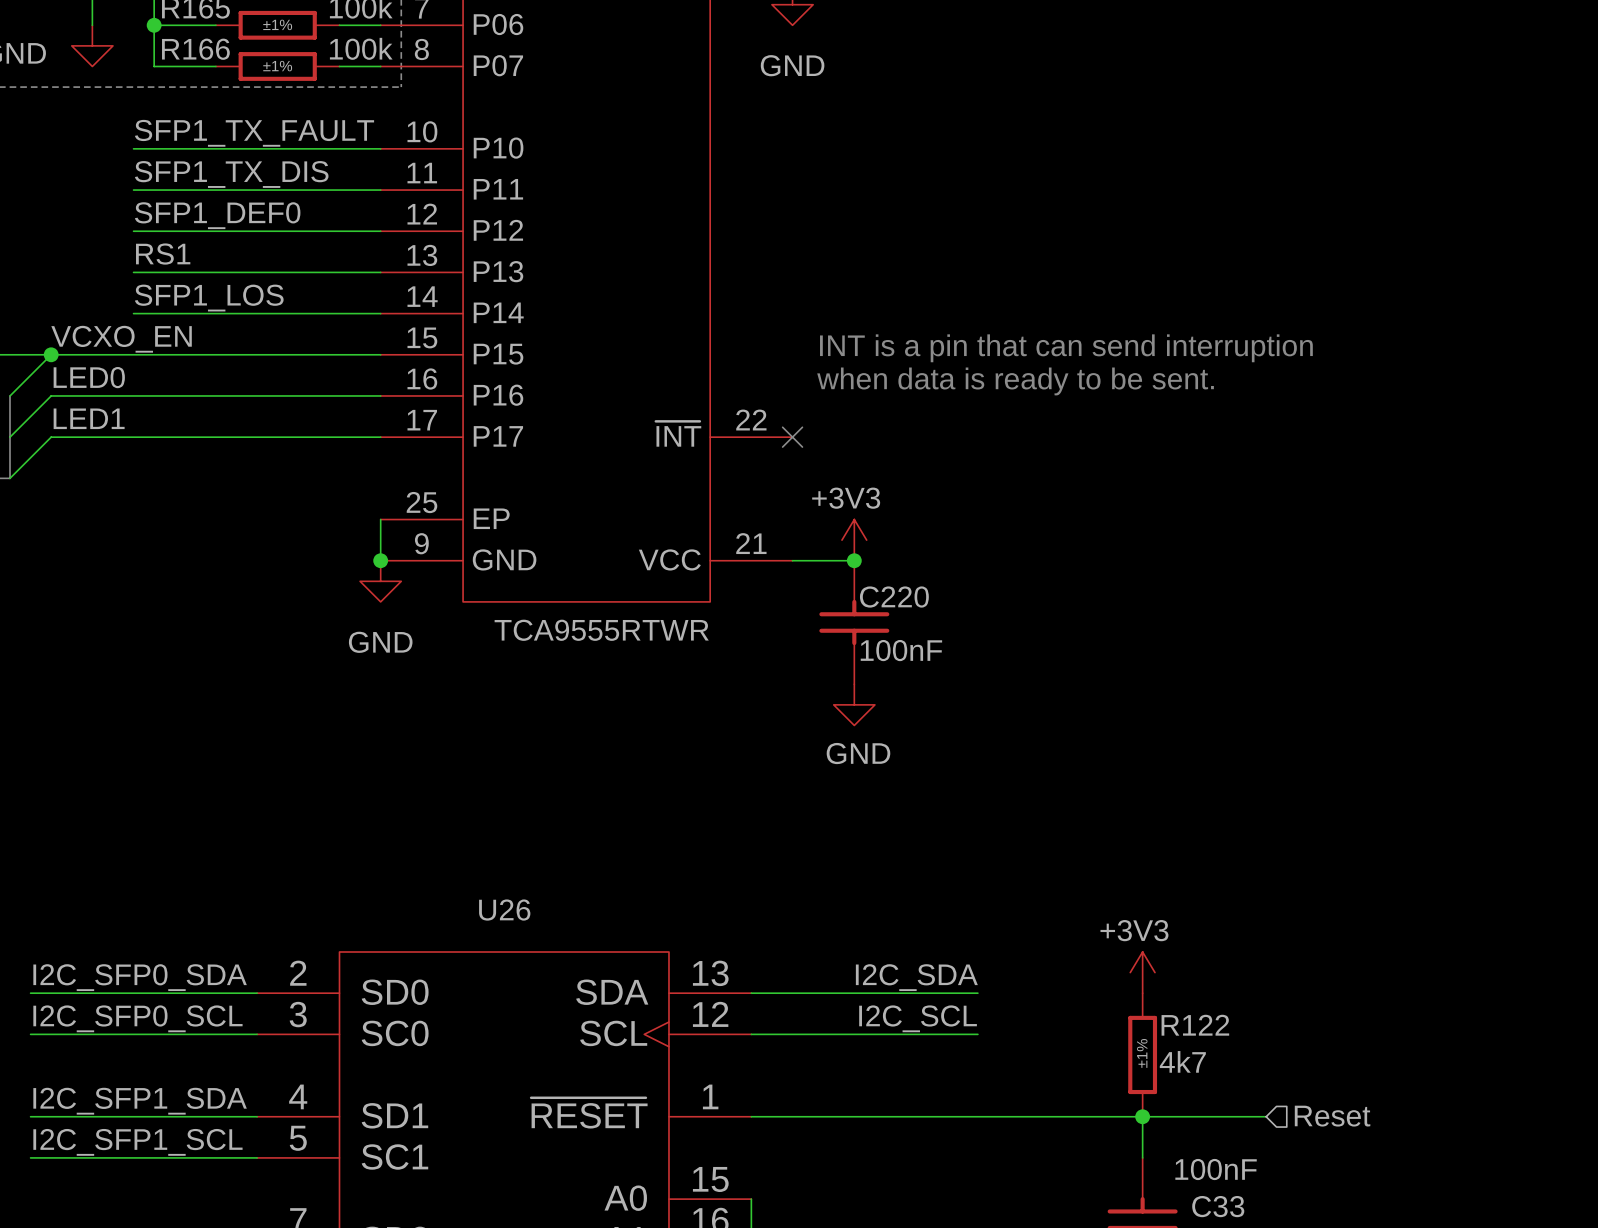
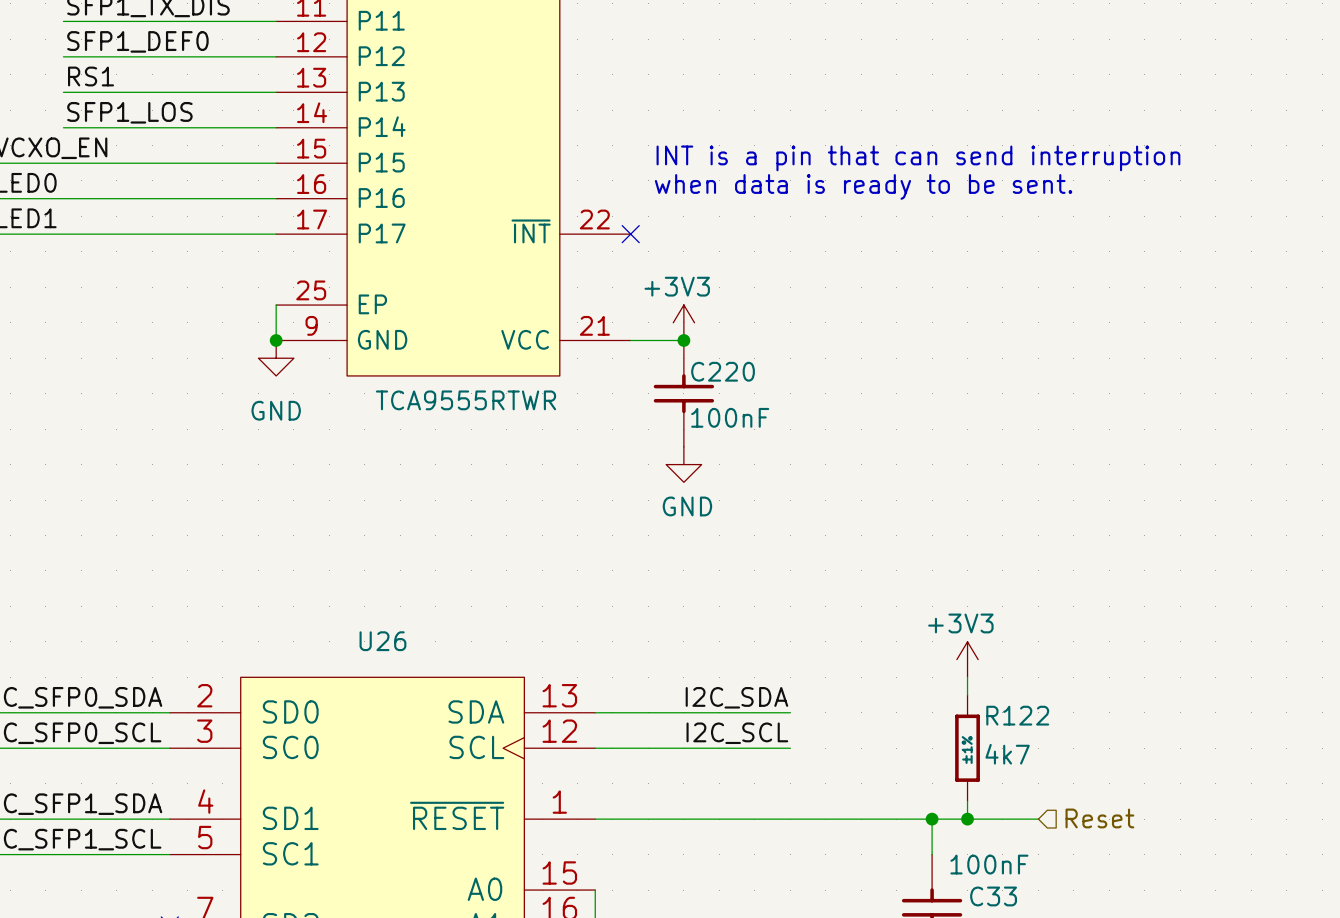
wire: none -> (967, 677) (967, 695)
power symbol position: +3V3 (1142, 972) -> +3V3 (967, 659)
R122 name position: R122 (1195, 1025) -> R122 (1017, 715)
R122 position: (1142, 1054) -> (967, 748)
wire: none -> (967, 801) (967, 819)
junction: none -> (967, 819)

